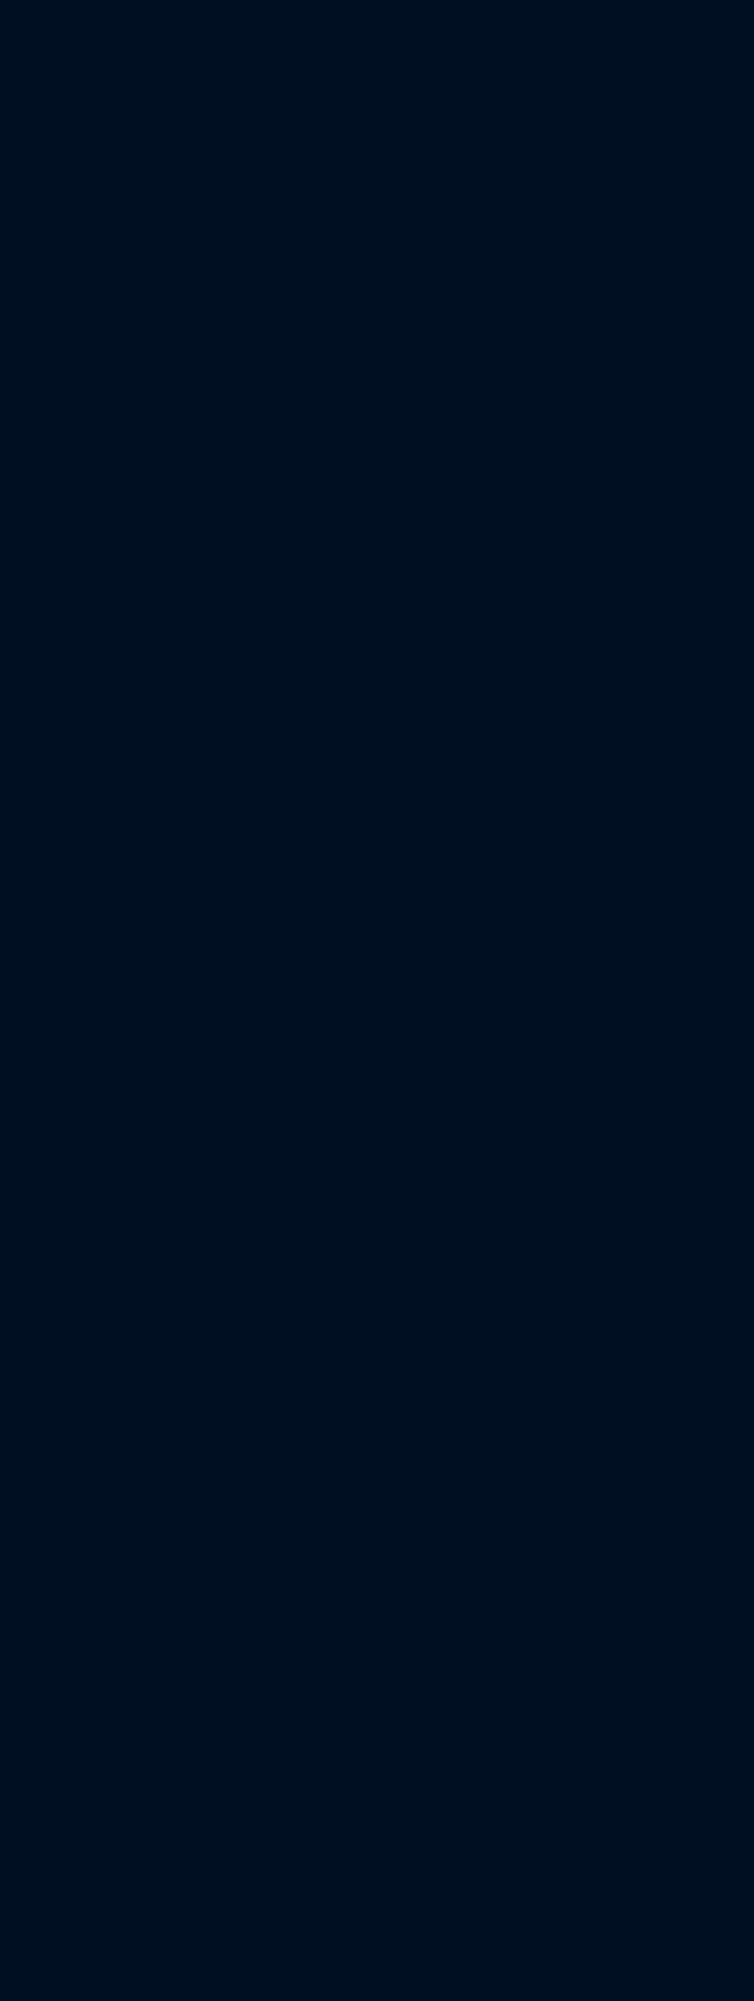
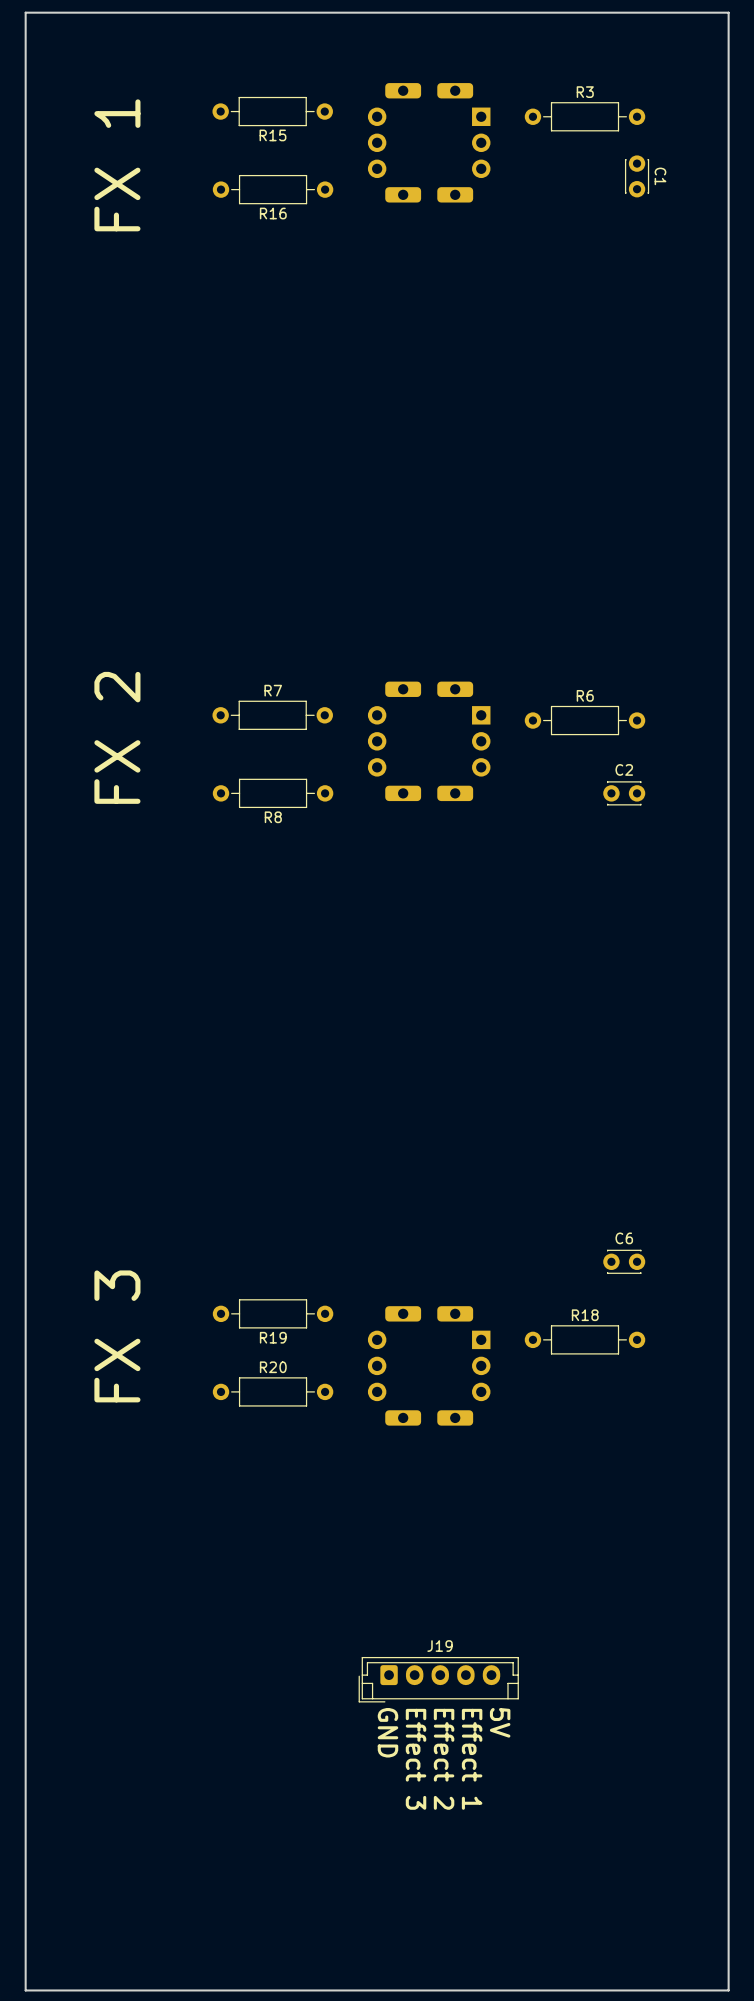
board edge: none -> (728, 12) (25, 12) (25, 1990) (728, 1990) (728, 12)
R15: none -> (272, 111)
R3: none -> (585, 116)
part: none -> (429, 142)
text: none -> FX 1 (117, 165)
C1: none -> (637, 176)
R16: none -> (273, 189)
R7: none -> (272, 715)
R6: none -> (585, 720)
text: none -> FX 2 (117, 737)
part: none -> (429, 741)
R8: none -> (273, 793)
C2: none -> (624, 793)
C6: none -> (624, 1261)
R19: none -> (273, 1313)
text: none -> FX 3 (117, 1336)
R18: none -> (585, 1339)
part: none -> (429, 1365)
R20: none -> (273, 1391)
J19: none -> (438, 1679)
text: none -> 5V (500, 1722)
text: none -> GND (387, 1732)
text: none -> Effect 3 (416, 1759)
text: none -> Effect 2 (444, 1759)
text: none -> Effect 1 (472, 1759)

